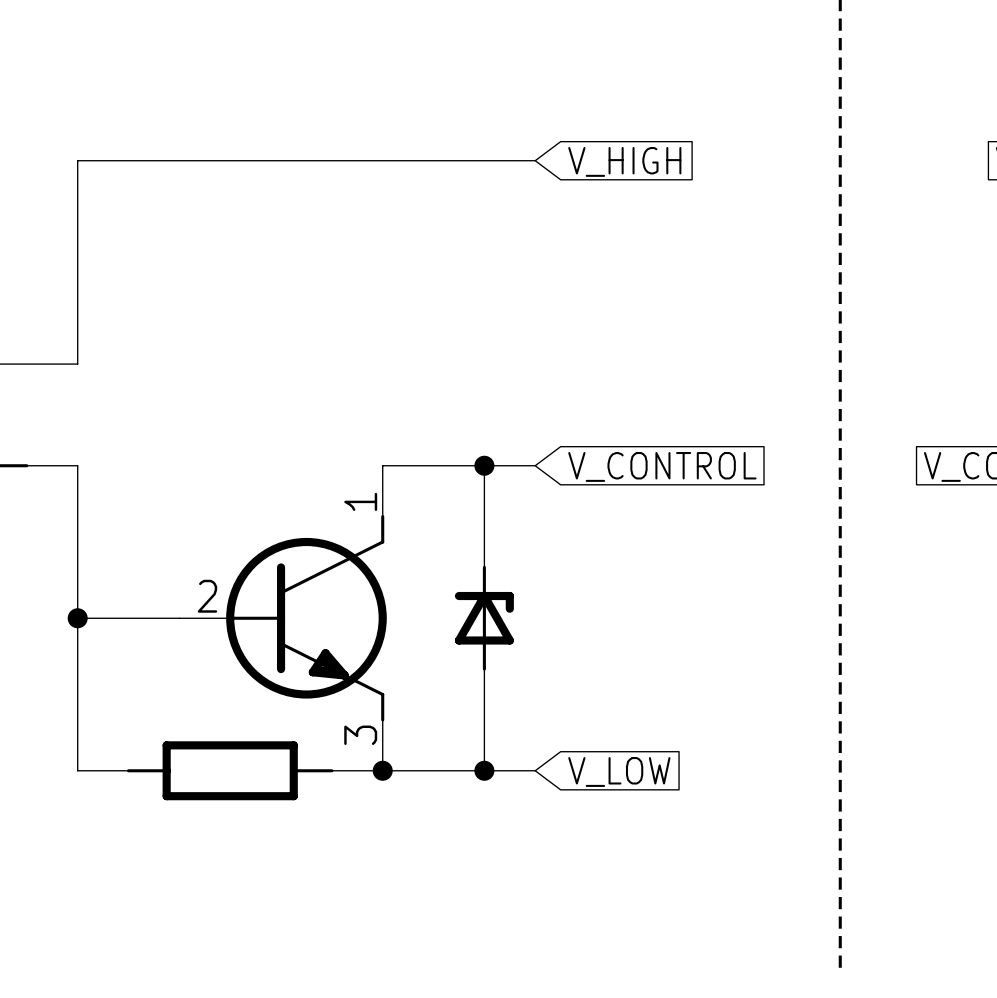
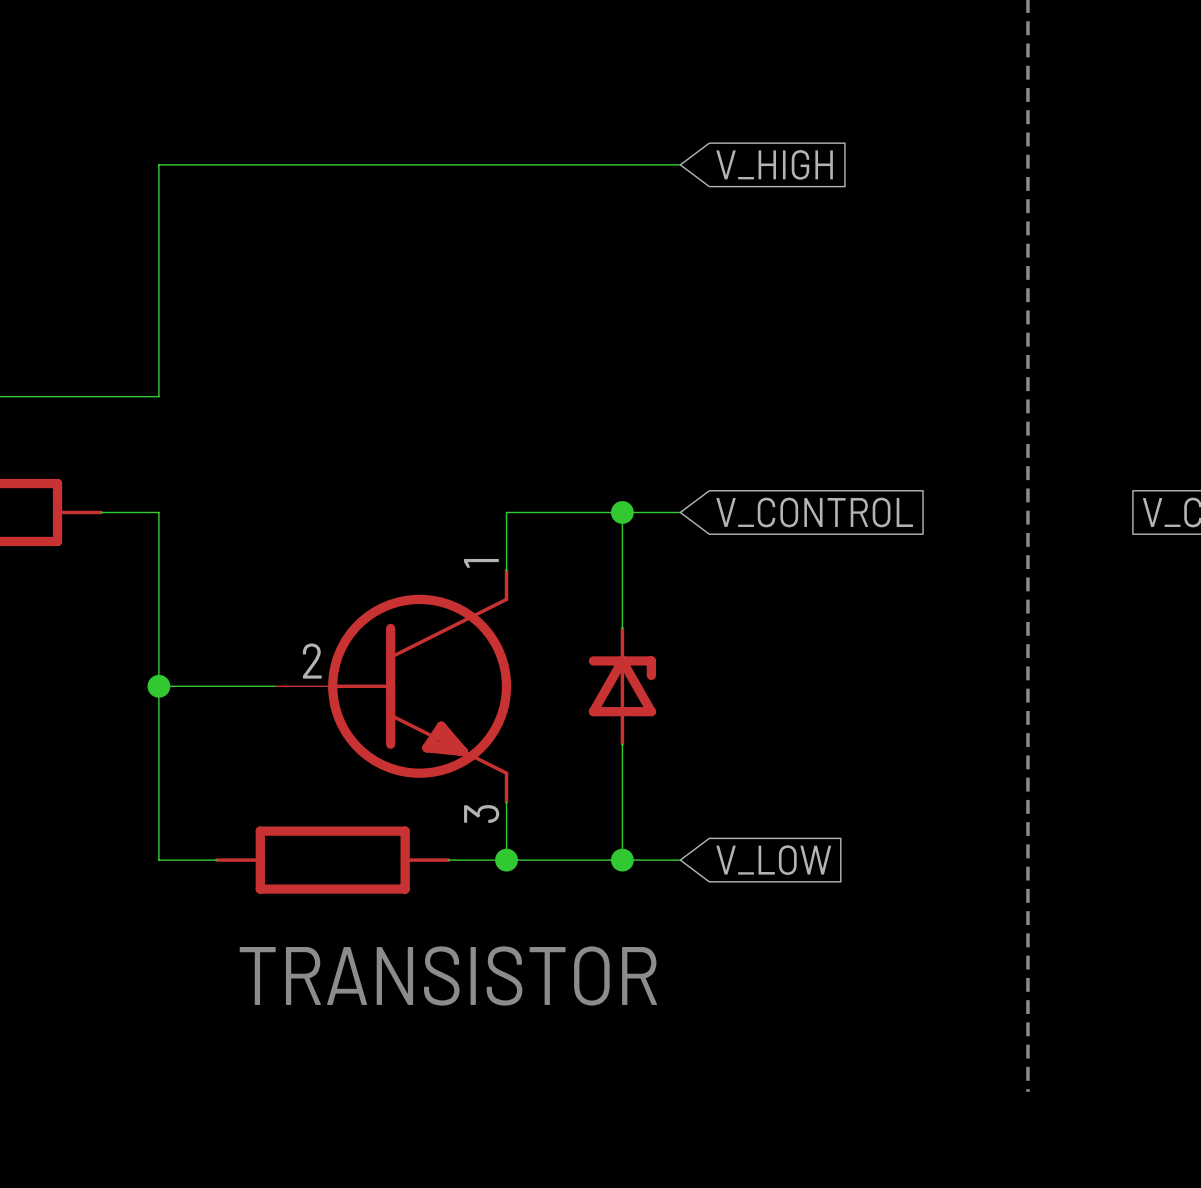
text: none -> TRANSISTOR (448, 975)

